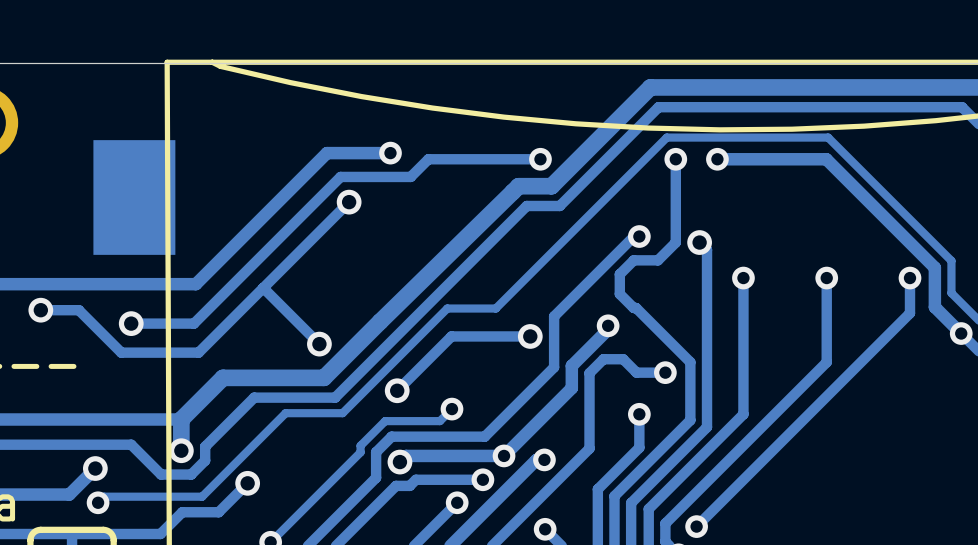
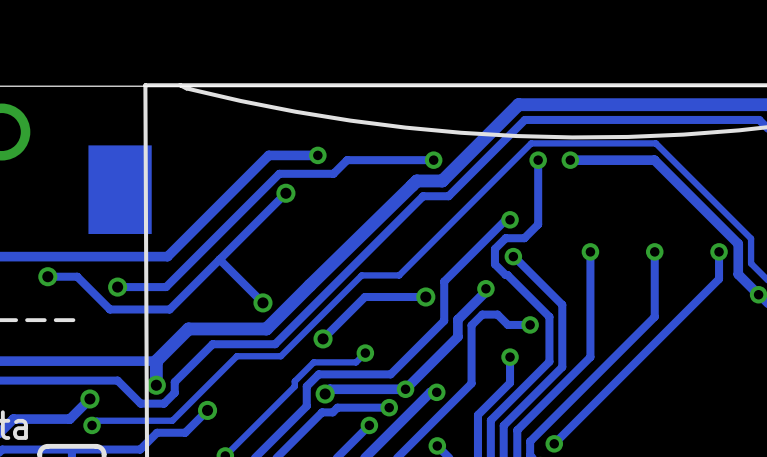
track: (699, 242) (707, 249) (707, 346) -> (513, 256) (562, 304)
via: (699, 242) -> none
via: none -> (513, 256)

